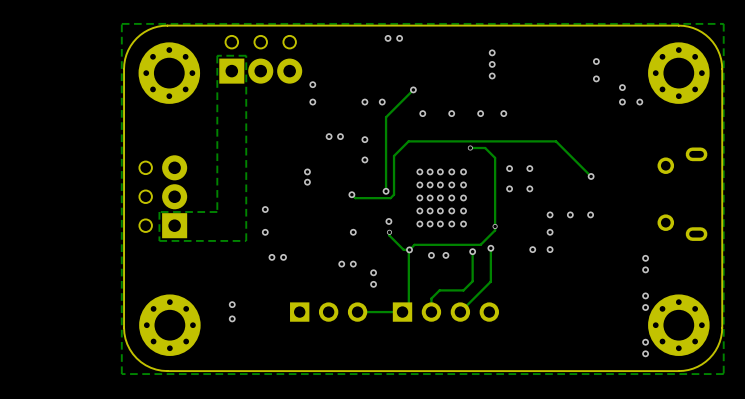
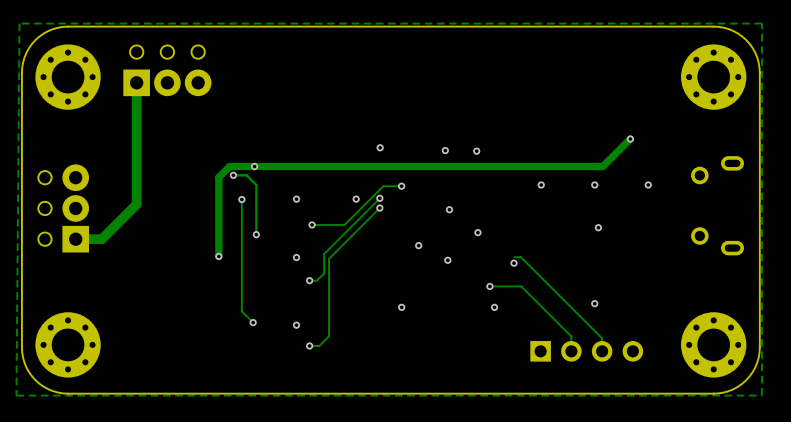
zone outline: (723, 23) (121, 23) (121, 374) (723, 374) (723, 23) -> (762, 23) (762, 395) (16, 395) (19, 23) (762, 23)
board edge: (167, 25) (148, 29) (136, 38) (126, 54) (124, 69) (124, 333) (129, 349) (136, 358) (150, 367) (167, 371) -> (170, 26) (68, 26) (52, 29) (39, 36) (32, 43) (24, 57) (21, 72) (21, 347) (26, 367) (39, 383) (57, 392) (170, 393)
via: (388, 38) -> none
via: (399, 38) -> none
part footprint: [138, 42, 201, 104] -> [123, 45, 212, 97]
via: (492, 52) -> none
zone outline: (246, 55) (217, 55) (217, 212) (159, 212) (159, 240) (246, 240) (246, 55) -> none
part: (260, 59) -> none
via: (596, 61) -> none
via: (492, 64) -> none
part: none -> (68, 77)
via: (492, 76) -> none
track: none -> (136, 82) (136, 204) (101, 239) (75, 239)
via: (596, 78) -> none
via: (312, 84) -> none
via: (622, 87) -> none
track: (413, 89) (386, 117) (386, 191) -> none
via: (413, 89) -> none
via: (312, 102) -> none
via: (364, 102) -> none
via: (382, 102) -> none
via: (622, 102) -> none
via: (639, 102) -> none
via: (422, 113) -> none
via: (451, 113) -> none
via: (480, 113) -> none
via: (503, 113) -> none
track: none -> (630, 139) (602, 166) (229, 166) (218, 177) (218, 256)
via: none -> (630, 139)
via: (329, 136) -> none
via: (340, 136) -> none
via: none -> (445, 150)
via: none -> (476, 151)
track: (470, 148) (485, 148) (495, 157) (495, 230) (480, 244) (414, 244) (409, 249) (403, 249) (389, 235) (389, 232) -> none
via: (470, 148) -> none
via: none -> (254, 166)
via: (364, 159) -> none
track: none -> (233, 175) (246, 175) (256, 185) (256, 234)
via: none -> (233, 175)
via: (509, 168) -> none
via: (529, 168) -> none
via: (307, 171) -> none
via: (419, 171) -> none
via: (430, 171) -> none
via: (440, 171) -> none
via: (451, 171) -> none
via: (463, 171) -> none
via: none -> (541, 184)
via: none -> (594, 184)
via: none -> (648, 184)
track: none -> (401, 186) (383, 186) (344, 224) (312, 224)
via: none -> (401, 186)
track: (591, 176) (556, 141) (408, 141) (394, 155) (394, 194) (390, 198) (355, 198) (351, 194) -> none
via: (591, 176) -> none
via: (307, 182) -> none
via: (419, 184) -> none
via: (430, 184) -> none
via: (440, 184) -> none
via: (451, 184) -> none
via: (463, 184) -> none
via: none -> (296, 199)
via: none -> (356, 199)
track: none -> (379, 198) (324, 254) (324, 273) (316, 280) (309, 280)
via: none -> (379, 198)
track: none -> (241, 199) (241, 311) (253, 322)
via: none -> (241, 199)
via: (509, 188) -> none
via: (529, 188) -> none
via: (386, 191) -> none
via: (351, 194) -> none
part position: (163, 196) -> (63, 208)
track: none -> (379, 208) (329, 258) (329, 336) (319, 346) (309, 346)
via: none -> (379, 208)
via: (419, 197) -> none
via: (440, 197) -> none
via: (451, 197) -> none
via: (463, 197) -> none
via: (265, 209) -> none
via: (419, 210) -> none
via: (430, 210) -> none
via: (440, 210) -> none
via: (451, 210) -> none
via: (463, 210) -> none
via: none -> (312, 224)
via: (550, 214) -> none
via: (590, 214) -> none
via: none -> (477, 232)
via: none -> (256, 234)
via: (388, 221) -> none
via: (419, 224) -> none
via: (430, 224) -> none
via: (440, 224) -> none
via: (451, 224) -> none
via: (463, 224) -> none
via: (495, 226) -> none
via: none -> (418, 245)
via: (265, 232) -> none
via: (353, 232) -> none
via: (389, 232) -> none
via: (550, 232) -> none
via: none -> (218, 256)
via: none -> (296, 257)
track: none -> (514, 257) (520, 257) (602, 338) (602, 351)
via: none -> (447, 260)
track: (490, 248) (490, 281) (460, 312) -> none
via: (409, 249) -> none
via: (532, 249) -> none
via: (550, 249) -> none
track: (408, 250) (408, 305) -> none
track: (472, 251) (472, 281) (463, 290) (439, 290) (431, 298) (431, 312) -> none
via: (472, 251) -> none
via: (431, 255) -> none
via: (445, 255) -> none
via: (271, 257) -> none
via: (283, 257) -> none
via: (645, 258) -> none
via: none -> (309, 280)
via: (341, 264) -> none
via: (353, 264) -> none
via: (645, 269) -> none
track: none -> (489, 286) (521, 286) (571, 336) (571, 351)
via: none -> (489, 286)
via: (373, 272) -> none
via: (373, 284) -> none
via: none -> (594, 303)
via: none -> (401, 307)
via: none -> (494, 307)
via: (645, 295) -> none
via: (232, 304) -> none
via: none -> (253, 322)
via: none -> (296, 325)
via: (645, 307) -> none
part: (328, 312) -> none
track: (402, 312) (357, 312) -> none
part position: (445, 312) -> (586, 351)
via: (232, 318) -> none
part position: (169, 325) -> (68, 344)
via: none -> (309, 346)
via: (645, 342) -> none
via: (645, 353) -> none

